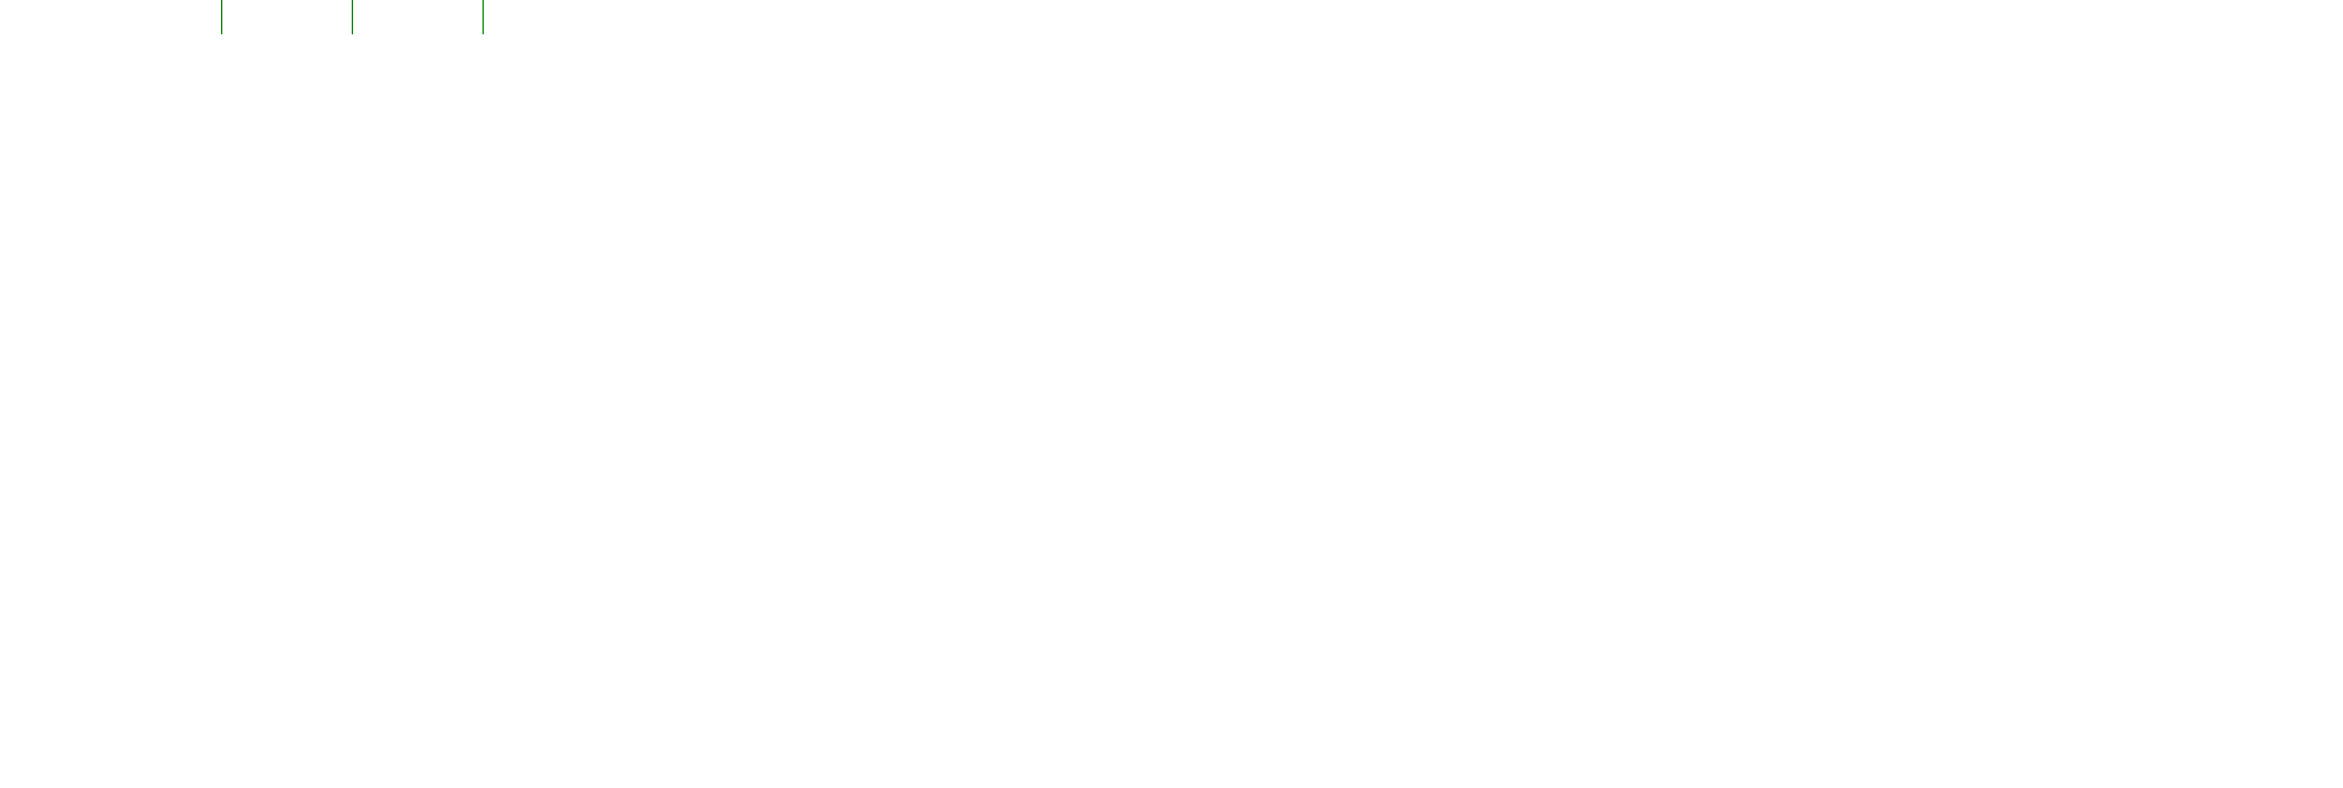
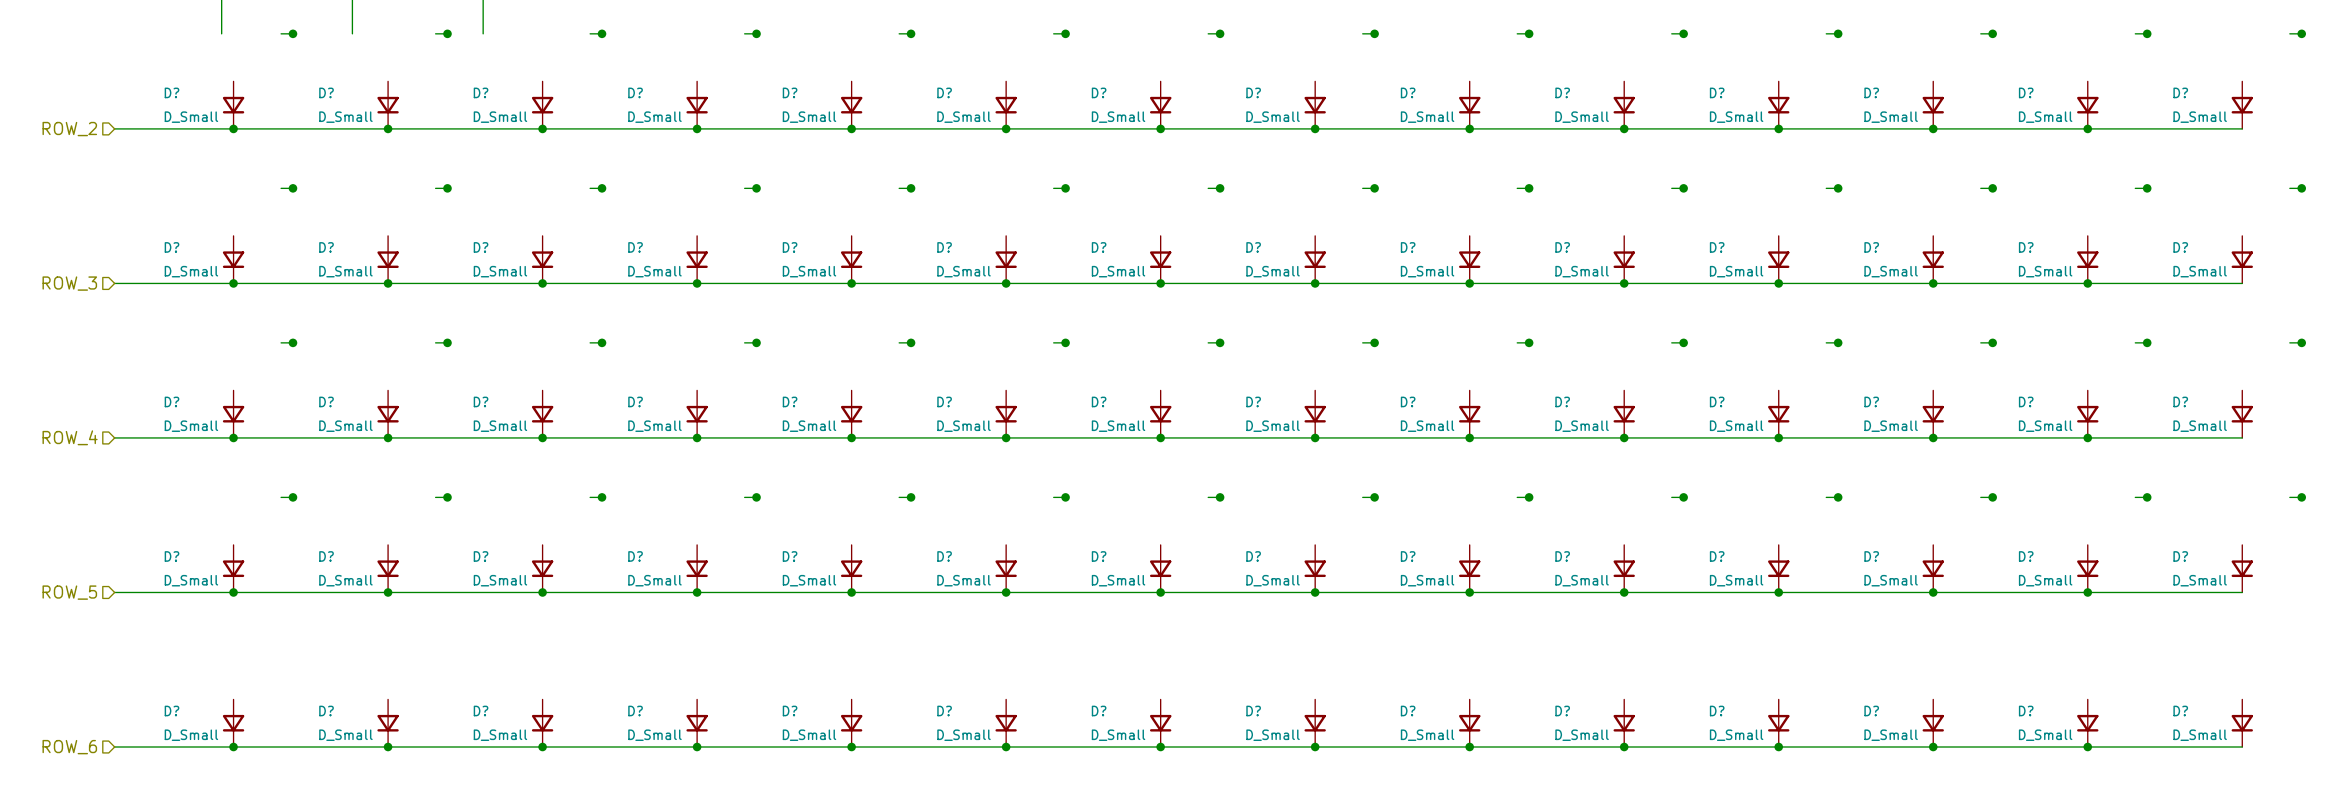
wire: none -> (281, 33) (292, 33)
junction: none -> (292, 33)
wire: none -> (435, 33) (447, 33)
junction: none -> (447, 33)
wire: none -> (590, 33) (602, 33)
junction: none -> (602, 33)
wire: none -> (744, 33) (756, 33)
junction: none -> (756, 33)
wire: none -> (899, 33) (911, 33)
junction: none -> (911, 33)
wire: none -> (1053, 33) (1065, 33)
junction: none -> (1065, 33)
wire: none -> (1208, 33) (1220, 33)
junction: none -> (1220, 33)
wire: none -> (1362, 33) (1374, 33)
junction: none -> (1374, 33)
wire: none -> (1517, 33) (1529, 33)
junction: none -> (1529, 33)
wire: none -> (1671, 33) (1683, 33)
junction: none -> (1683, 33)
wire: none -> (1826, 33) (1838, 33)
junction: none -> (1838, 33)
wire: none -> (1980, 33) (1992, 33)
junction: none -> (1992, 33)
wire: none -> (2135, 33) (2147, 33)
junction: none -> (2147, 33)
wire: none -> (2289, 33) (2301, 33)
junction: none -> (2301, 33)
D?: none -> D_Small (233, 105)
D?: none -> D_Small (388, 105)
D?: none -> D_Small (542, 105)
D?: none -> D_Small (697, 105)
D?: none -> D_Small (851, 105)
D?: none -> D_Small (1006, 105)
D?: none -> D_Small (1160, 105)
D?: none -> D_Small (1315, 105)
D?: none -> D_Small (1469, 105)
D?: none -> D_Small (1624, 105)
D?: none -> D_Small (1778, 105)
D?: none -> D_Small (1933, 105)
D?: none -> D_Small (2087, 105)
D?: none -> D_Small (2242, 105)
wire: none -> (114, 128) (2242, 128)
junction: none -> (233, 128)
junction: none -> (388, 128)
junction: none -> (542, 128)
junction: none -> (697, 128)
junction: none -> (851, 128)
junction: none -> (1006, 128)
junction: none -> (1160, 128)
junction: none -> (1315, 128)
junction: none -> (1469, 128)
junction: none -> (1624, 128)
junction: none -> (1778, 128)
junction: none -> (1933, 128)
junction: none -> (2087, 128)
hierarchical label: none -> ROW_2 (69, 129)
wire: none -> (281, 188) (292, 188)
junction: none -> (292, 188)
wire: none -> (435, 188) (447, 188)
junction: none -> (447, 188)
wire: none -> (590, 188) (602, 188)
junction: none -> (602, 188)
wire: none -> (744, 188) (756, 188)
junction: none -> (756, 188)
wire: none -> (899, 188) (911, 188)
junction: none -> (911, 188)
wire: none -> (1053, 188) (1065, 188)
junction: none -> (1065, 188)
wire: none -> (1208, 188) (1220, 188)
junction: none -> (1220, 188)
wire: none -> (1362, 188) (1374, 188)
junction: none -> (1374, 188)
wire: none -> (1517, 188) (1529, 188)
junction: none -> (1529, 188)
wire: none -> (1671, 188) (1683, 188)
junction: none -> (1683, 188)
wire: none -> (1826, 188) (1838, 188)
junction: none -> (1838, 188)
wire: none -> (1980, 188) (1992, 188)
junction: none -> (1992, 188)
wire: none -> (2135, 188) (2147, 188)
junction: none -> (2147, 188)
wire: none -> (2289, 188) (2301, 188)
junction: none -> (2301, 188)
D?: none -> D_Small (233, 259)
D?: none -> D_Small (388, 259)
D?: none -> D_Small (542, 259)
D?: none -> D_Small (697, 259)
D?: none -> D_Small (851, 259)
D?: none -> D_Small (1006, 259)
D?: none -> D_Small (1160, 259)
D?: none -> D_Small (1315, 259)
D?: none -> D_Small (1469, 259)
D?: none -> D_Small (1624, 259)
D?: none -> D_Small (1778, 259)
D?: none -> D_Small (1933, 259)
D?: none -> D_Small (2087, 259)
D?: none -> D_Small (2242, 259)
hierarchical label: none -> ROW_3 (69, 283)
wire: none -> (114, 283) (2242, 283)
junction: none -> (233, 283)
junction: none -> (388, 283)
junction: none -> (542, 283)
junction: none -> (697, 283)
junction: none -> (851, 283)
junction: none -> (1006, 283)
junction: none -> (1160, 283)
junction: none -> (1315, 283)
junction: none -> (1469, 283)
junction: none -> (1624, 283)
junction: none -> (1778, 283)
junction: none -> (1933, 283)
junction: none -> (2087, 283)
wire: none -> (281, 342) (292, 342)
junction: none -> (292, 342)
wire: none -> (435, 342) (447, 342)
junction: none -> (447, 342)
wire: none -> (590, 342) (602, 342)
junction: none -> (602, 342)
wire: none -> (744, 342) (756, 342)
junction: none -> (756, 342)
wire: none -> (899, 342) (911, 342)
junction: none -> (911, 342)
wire: none -> (1053, 342) (1065, 342)
junction: none -> (1065, 342)
wire: none -> (1208, 342) (1220, 342)
junction: none -> (1220, 342)
wire: none -> (1362, 342) (1374, 342)
junction: none -> (1374, 342)
wire: none -> (1517, 342) (1529, 342)
junction: none -> (1529, 342)
wire: none -> (1671, 342) (1683, 342)
junction: none -> (1683, 342)
wire: none -> (1826, 342) (1838, 342)
junction: none -> (1838, 342)
wire: none -> (1980, 342) (1992, 342)
junction: none -> (1992, 342)
wire: none -> (2135, 342) (2147, 342)
junction: none -> (2147, 342)
wire: none -> (2289, 342) (2301, 342)
junction: none -> (2301, 342)
D?: none -> D_Small (233, 414)
D?: none -> D_Small (388, 414)
D?: none -> D_Small (542, 414)
D?: none -> D_Small (697, 414)
D?: none -> D_Small (851, 414)
D?: none -> D_Small (1006, 414)
D?: none -> D_Small (1160, 414)
D?: none -> D_Small (1315, 414)
D?: none -> D_Small (1469, 414)
D?: none -> D_Small (1624, 414)
D?: none -> D_Small (1778, 414)
D?: none -> D_Small (1933, 414)
D?: none -> D_Small (2087, 414)
D?: none -> D_Small (2242, 414)
hierarchical label: none -> ROW_4 (70, 437)
wire: none -> (114, 437) (2242, 437)
junction: none -> (233, 437)
junction: none -> (388, 437)
junction: none -> (542, 437)
junction: none -> (697, 437)
junction: none -> (851, 437)
junction: none -> (1006, 437)
junction: none -> (1160, 437)
junction: none -> (1315, 437)
junction: none -> (1469, 437)
junction: none -> (1624, 437)
junction: none -> (1778, 437)
junction: none -> (1933, 437)
junction: none -> (2087, 437)
wire: none -> (281, 497) (292, 497)
junction: none -> (292, 497)
wire: none -> (435, 497) (447, 497)
junction: none -> (447, 497)
wire: none -> (590, 497) (602, 497)
junction: none -> (602, 497)
wire: none -> (744, 497) (756, 497)
junction: none -> (756, 497)
wire: none -> (899, 497) (911, 497)
junction: none -> (911, 497)
wire: none -> (1053, 497) (1065, 497)
junction: none -> (1065, 497)
wire: none -> (1208, 497) (1220, 497)
junction: none -> (1220, 497)
wire: none -> (1362, 497) (1374, 497)
junction: none -> (1374, 497)
wire: none -> (1517, 497) (1529, 497)
junction: none -> (1529, 497)
wire: none -> (1671, 497) (1683, 497)
junction: none -> (1683, 497)
wire: none -> (1826, 497) (1838, 497)
junction: none -> (1838, 497)
wire: none -> (1980, 497) (1992, 497)
junction: none -> (1992, 497)
wire: none -> (2135, 497) (2147, 497)
junction: none -> (2147, 497)
wire: none -> (2289, 497) (2301, 497)
junction: none -> (2301, 497)
D?: none -> D_Small (233, 568)
D?: none -> D_Small (388, 568)
D?: none -> D_Small (542, 568)
D?: none -> D_Small (697, 568)
D?: none -> D_Small (851, 568)
D?: none -> D_Small (1006, 568)
D?: none -> D_Small (1160, 568)
D?: none -> D_Small (1315, 568)
D?: none -> D_Small (1469, 568)
D?: none -> D_Small (1624, 568)
D?: none -> D_Small (1778, 568)
D?: none -> D_Small (1933, 568)
D?: none -> D_Small (2087, 568)
D?: none -> D_Small (2242, 568)
hierarchical label: none -> ROW_5 (69, 592)
wire: none -> (114, 592) (2242, 592)
junction: none -> (233, 592)
junction: none -> (388, 592)
junction: none -> (542, 592)
junction: none -> (697, 592)
junction: none -> (851, 592)
junction: none -> (1006, 592)
junction: none -> (1160, 592)
junction: none -> (1315, 592)
junction: none -> (1469, 592)
junction: none -> (1624, 592)
junction: none -> (1778, 592)
junction: none -> (1933, 592)
junction: none -> (2087, 592)
D?: none -> D_Small (233, 723)
D?: none -> D_Small (388, 723)
D?: none -> D_Small (542, 723)
D?: none -> D_Small (697, 723)
D?: none -> D_Small (851, 723)
D?: none -> D_Small (1006, 723)
D?: none -> D_Small (1160, 723)
D?: none -> D_Small (1315, 723)
D?: none -> D_Small (1469, 723)
D?: none -> D_Small (1624, 723)
D?: none -> D_Small (1778, 723)
D?: none -> D_Small (1933, 723)
D?: none -> D_Small (2087, 723)
D?: none -> D_Small (2242, 723)
hierarchical label: none -> ROW_6 (69, 747)
wire: none -> (114, 747) (2242, 747)
junction: none -> (233, 747)
junction: none -> (388, 747)
junction: none -> (542, 747)
junction: none -> (697, 747)
junction: none -> (851, 747)
junction: none -> (1006, 747)
junction: none -> (1160, 747)
junction: none -> (1315, 747)
junction: none -> (1469, 747)
junction: none -> (1624, 747)
junction: none -> (1778, 747)
junction: none -> (1933, 747)
junction: none -> (2087, 747)

